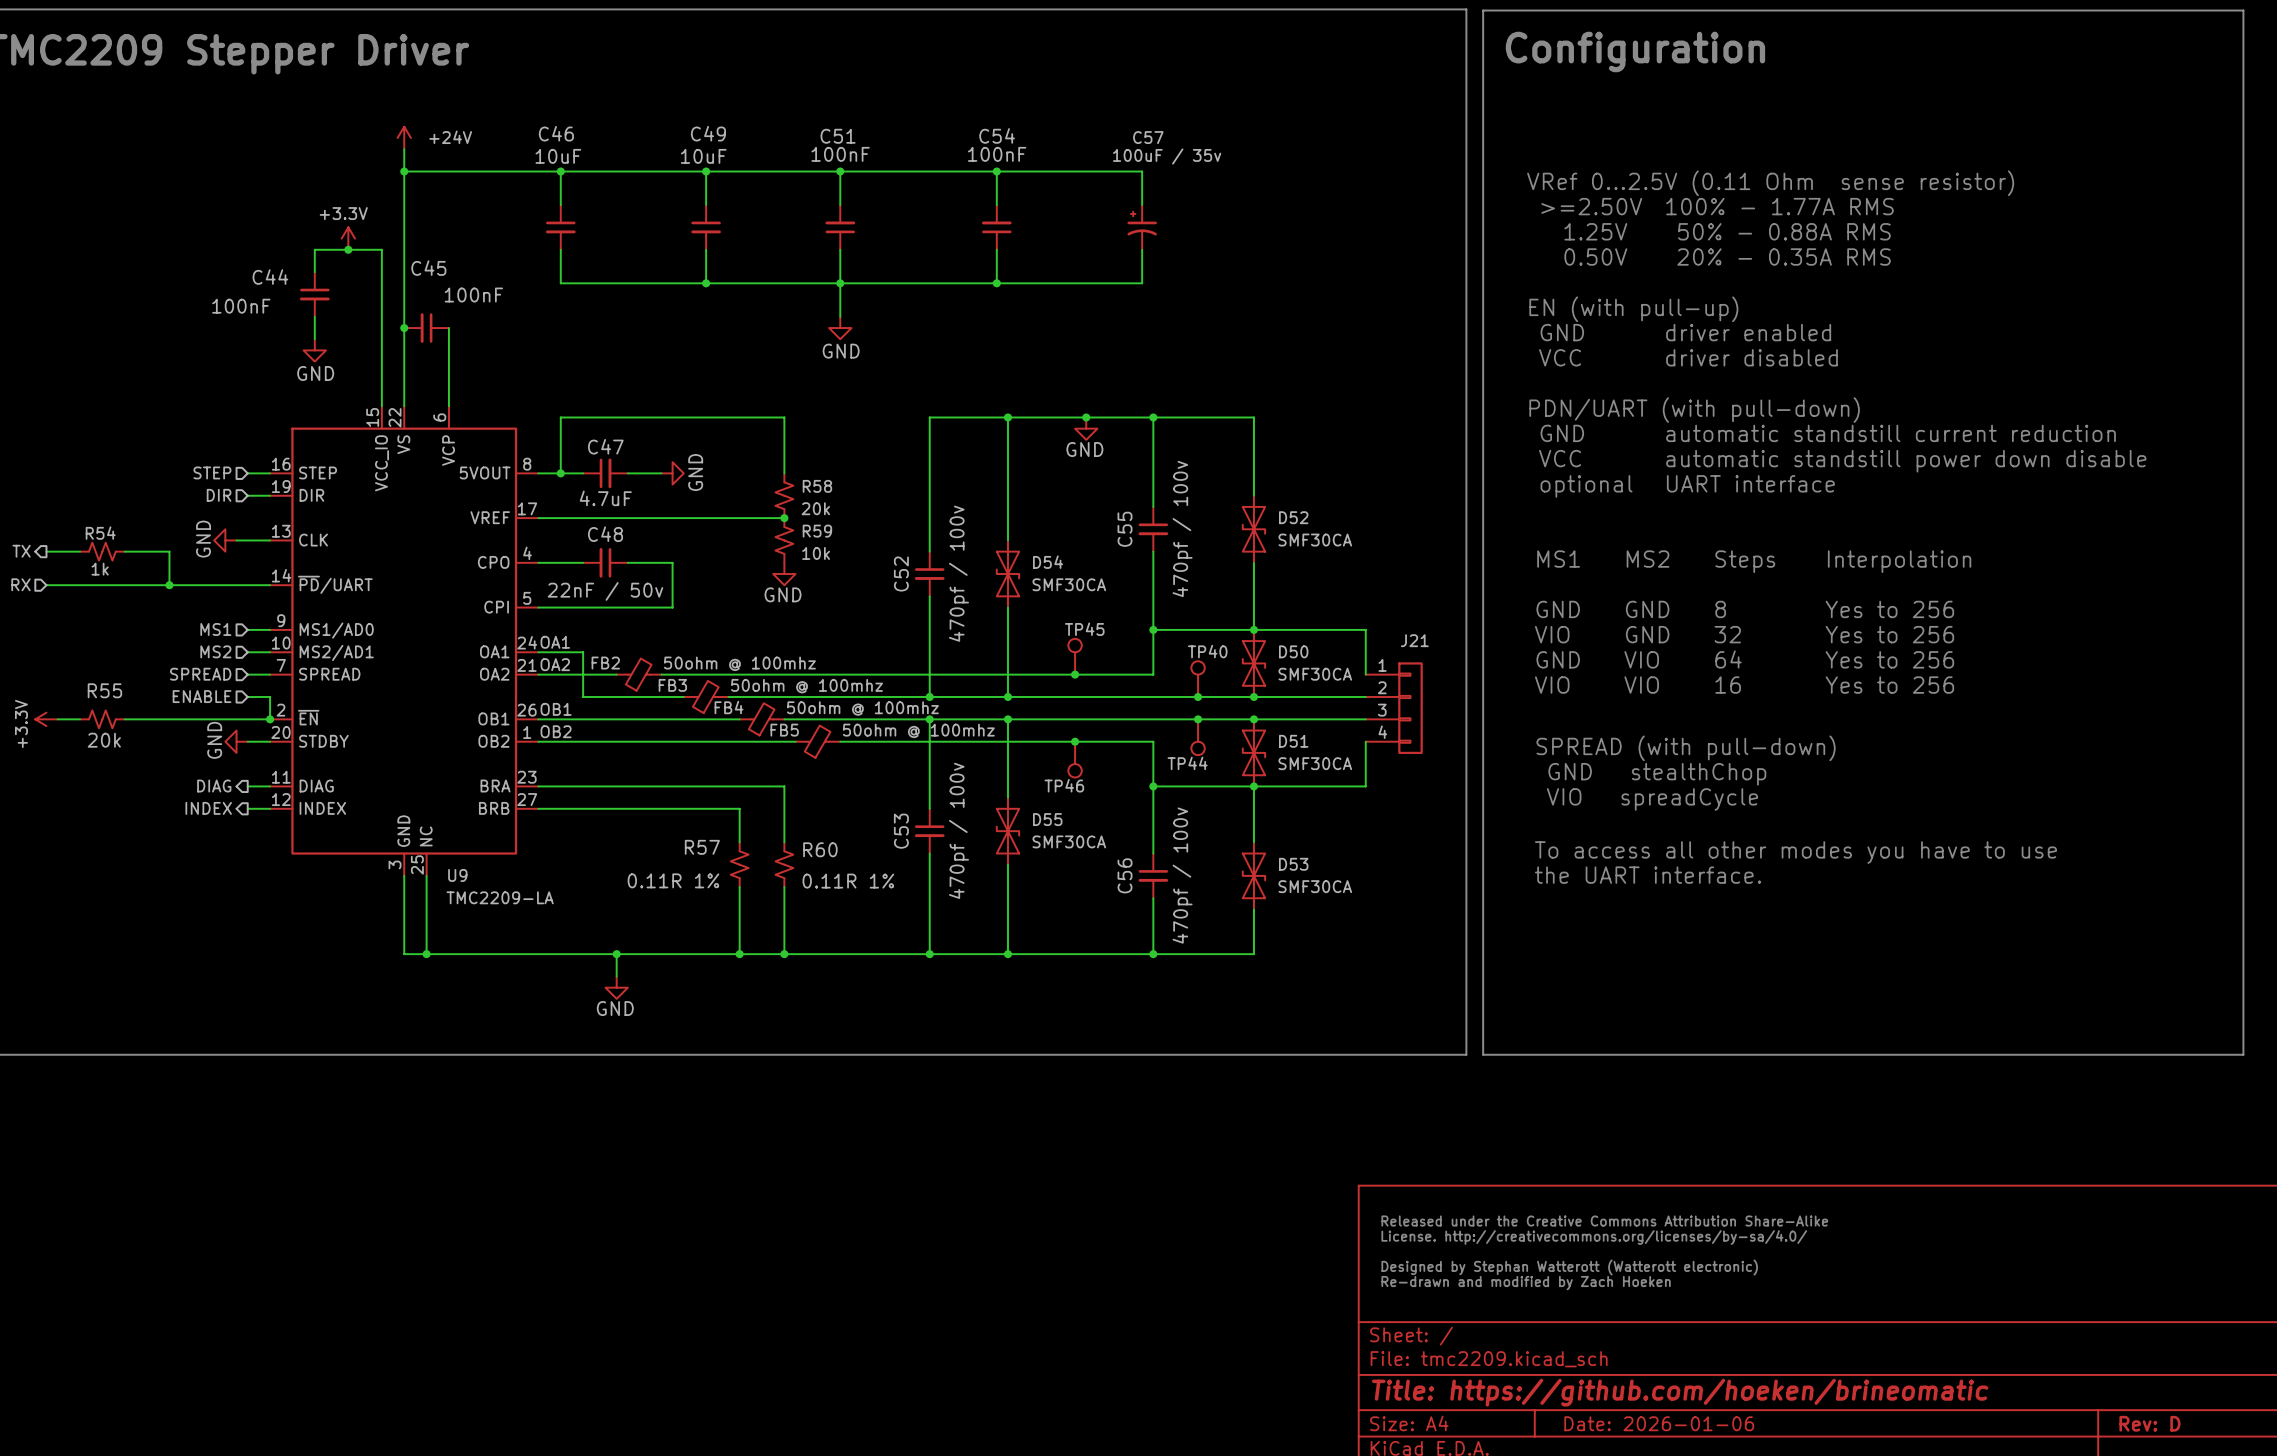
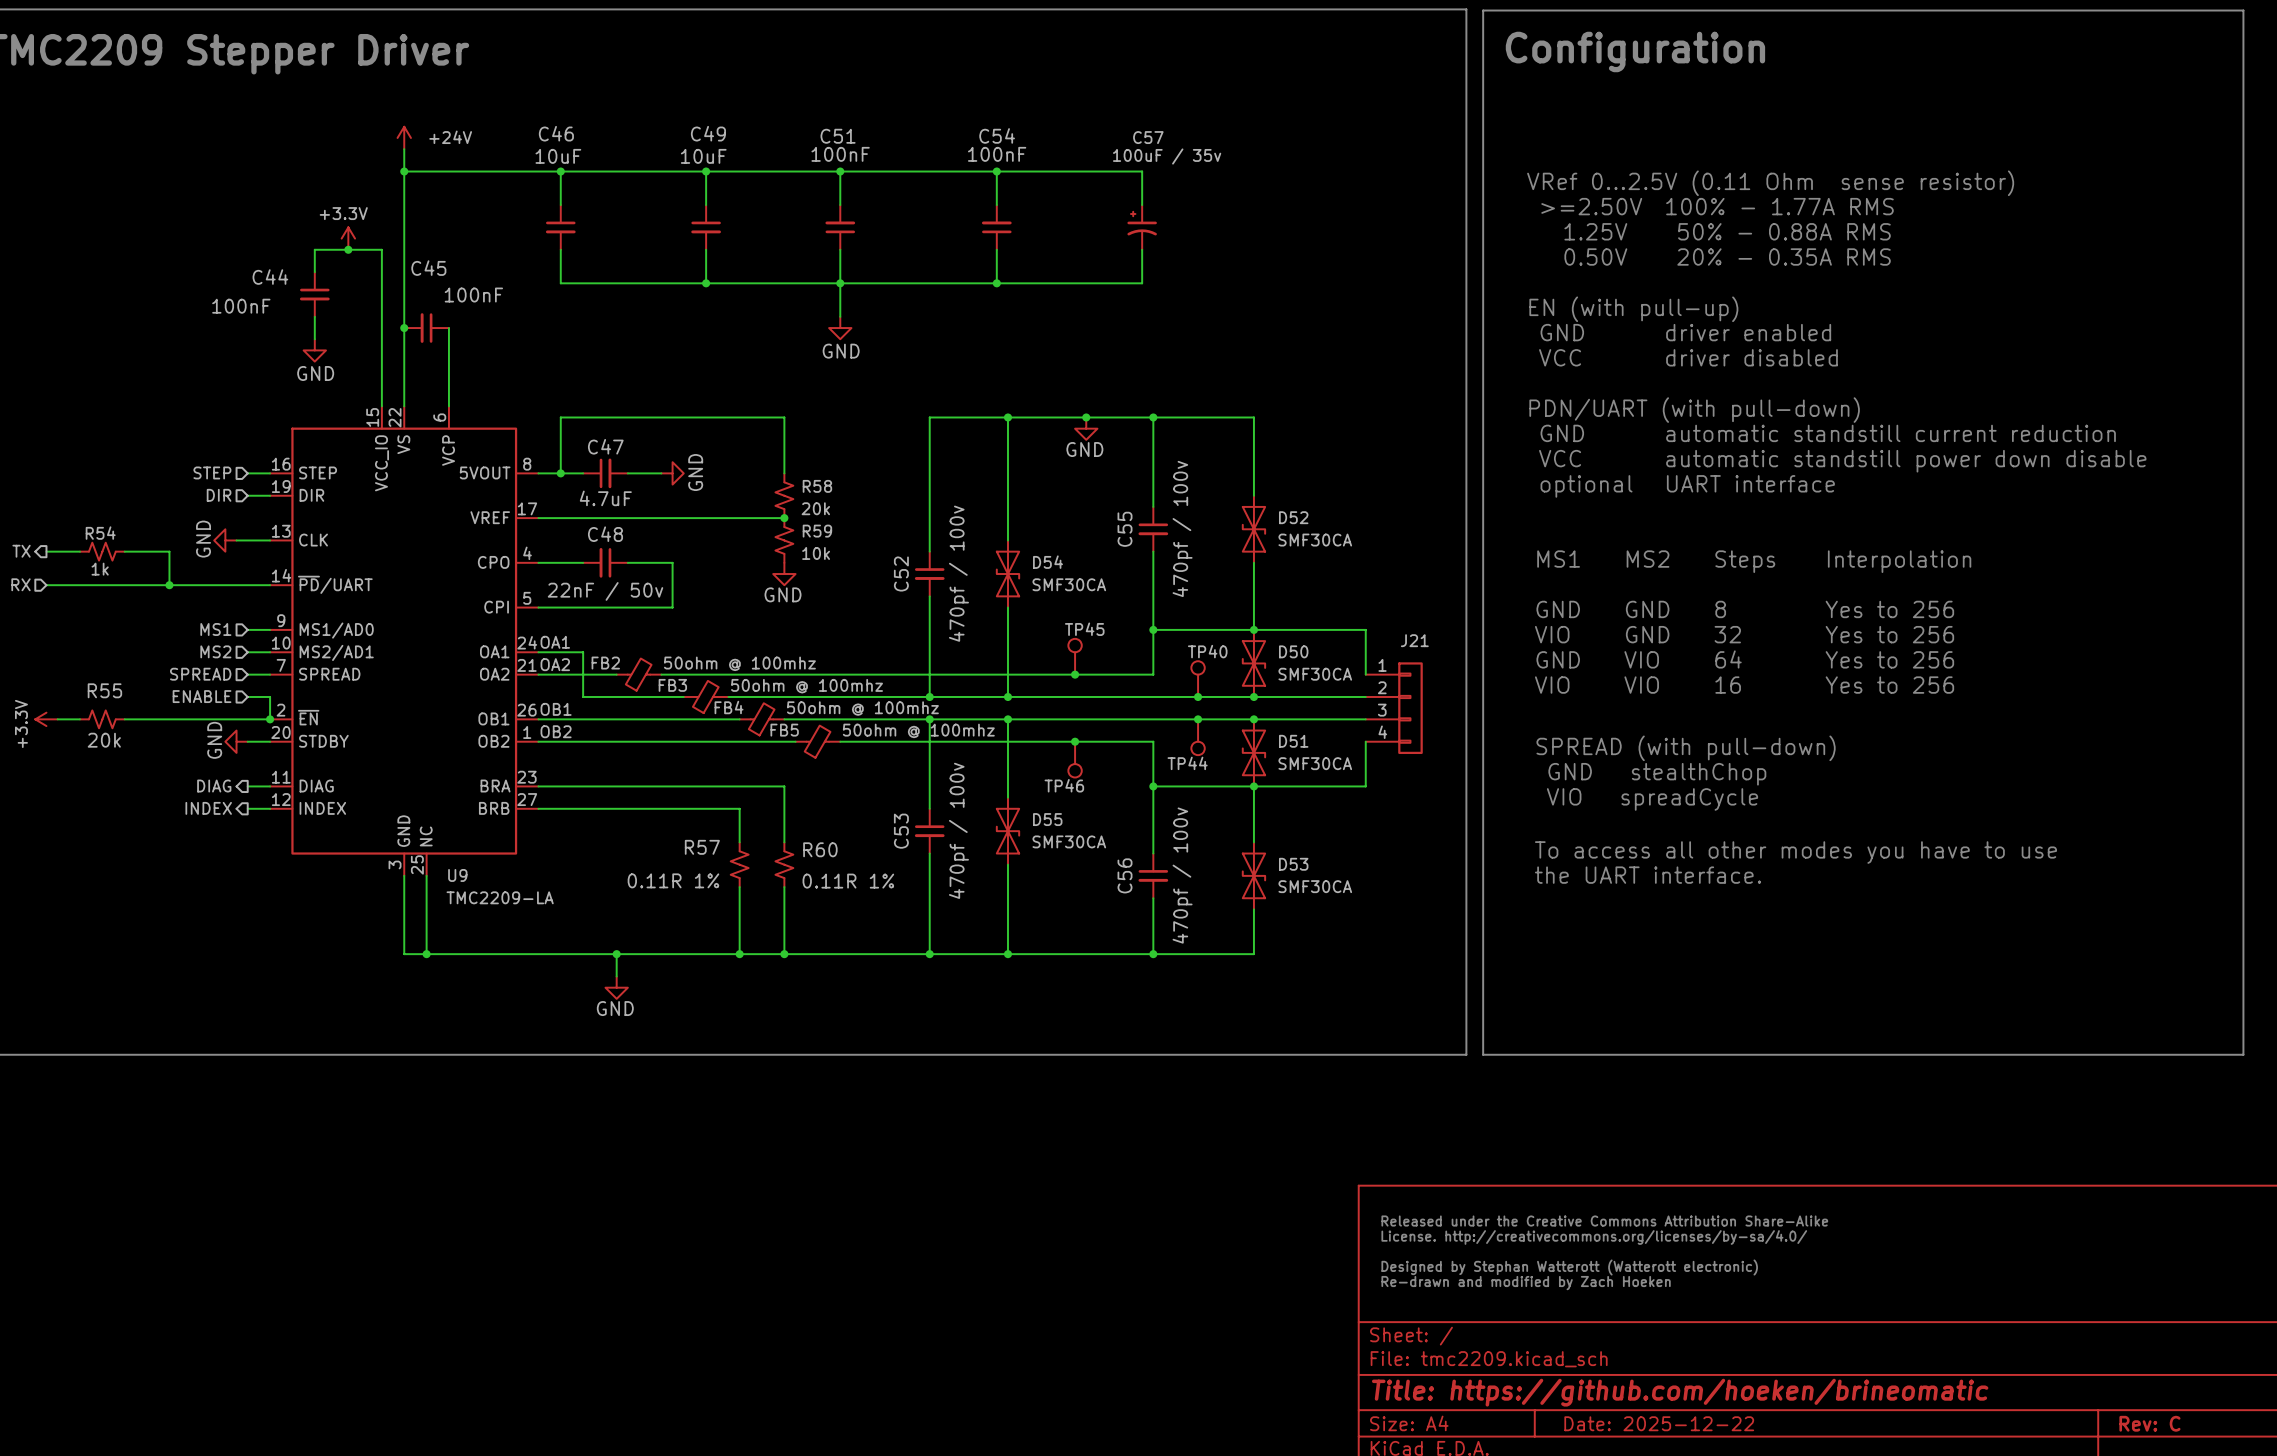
title block: Date: 2026-01-06 (1659, 1423) -> Date: 2025-12-22 (1659, 1423)
title block: Rev: D (2149, 1423) -> Rev: C (2149, 1423)

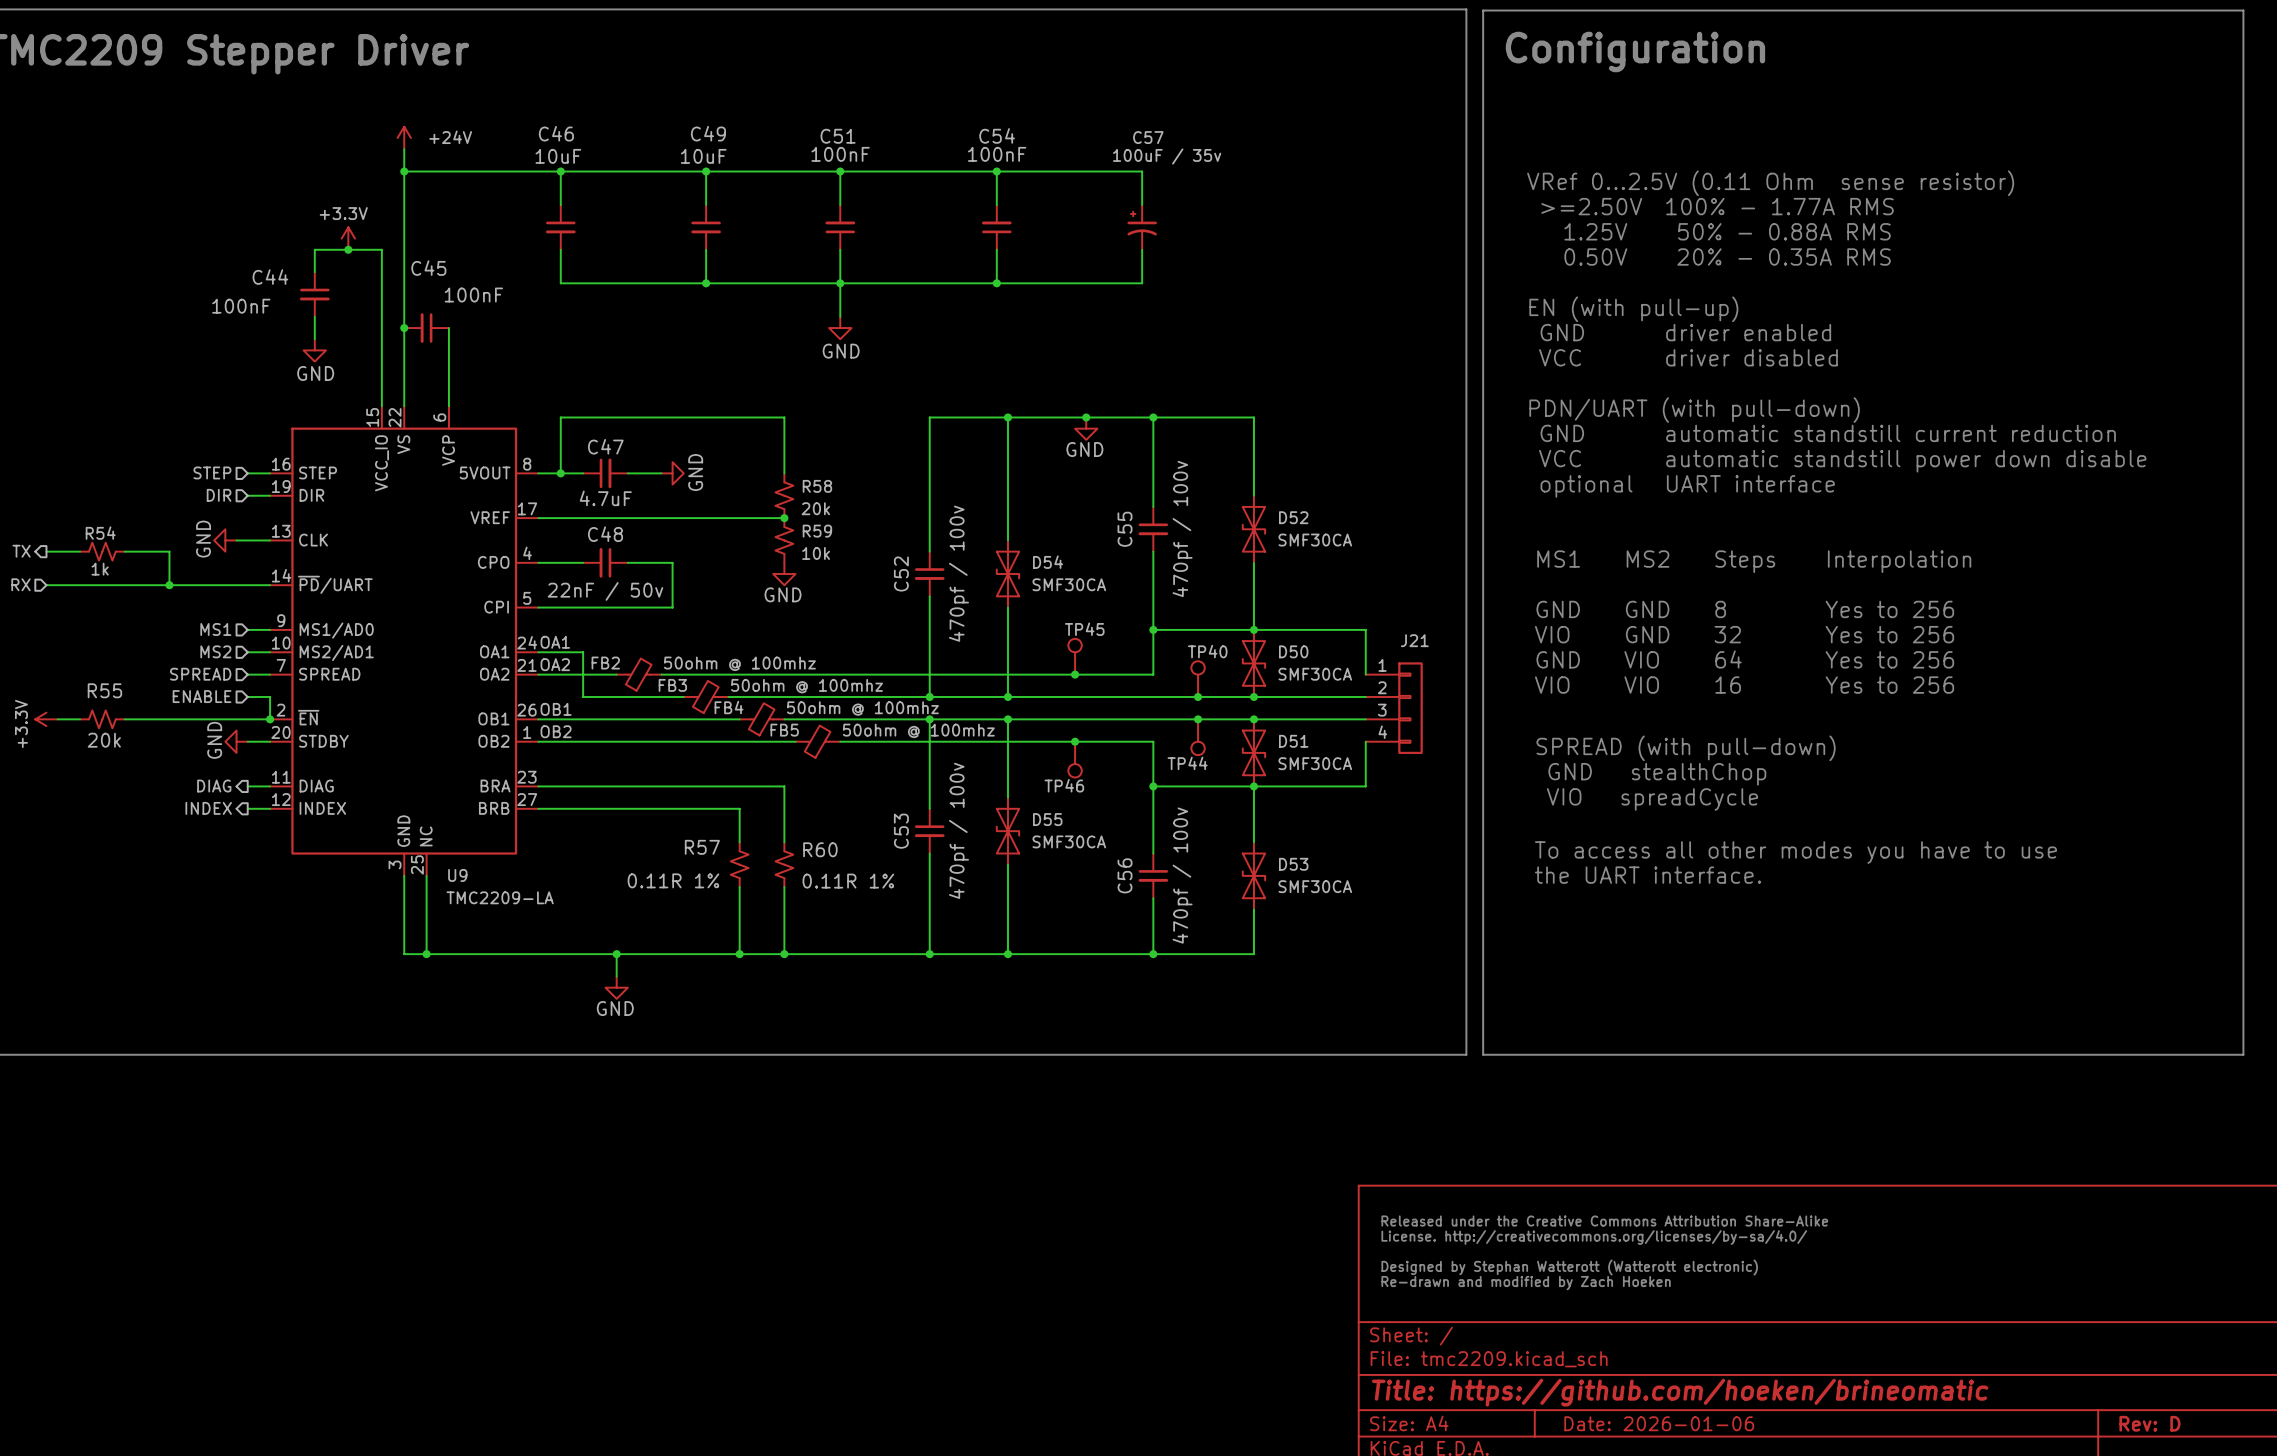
title block: Date: 2025-12-22 (1659, 1423) -> Date: 2026-01-06 (1659, 1423)
title block: Rev: C (2149, 1423) -> Rev: D (2149, 1423)

